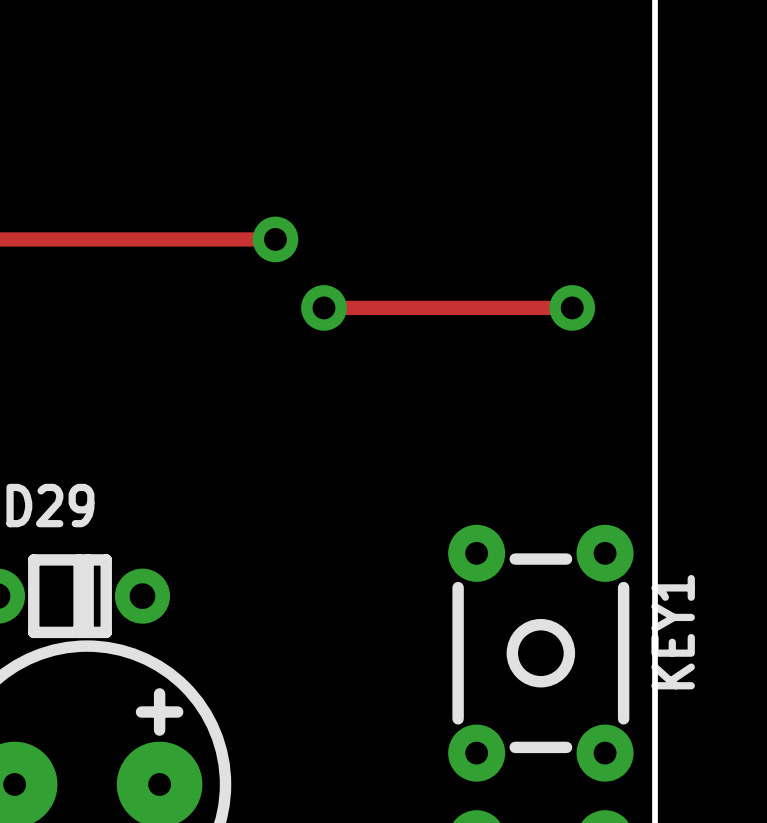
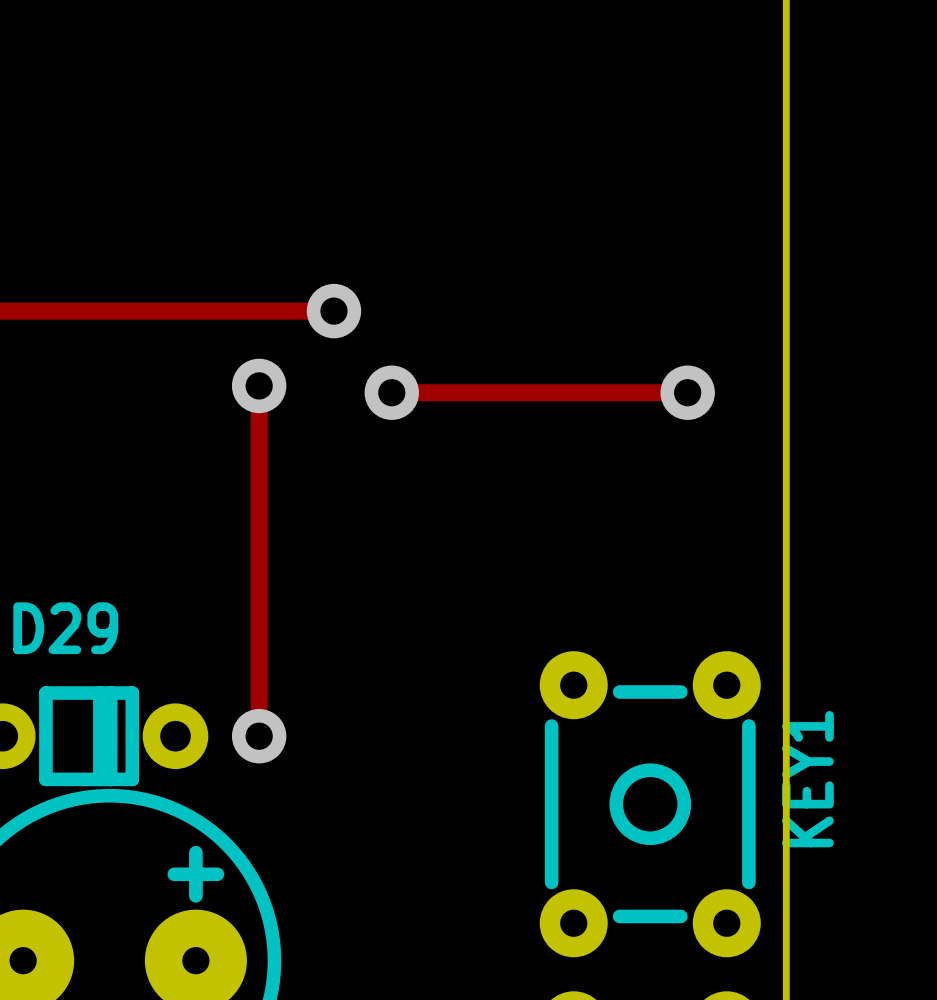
track: none -> (259, 385) (259, 736)
via: none -> (259, 385)
via: none -> (259, 736)

